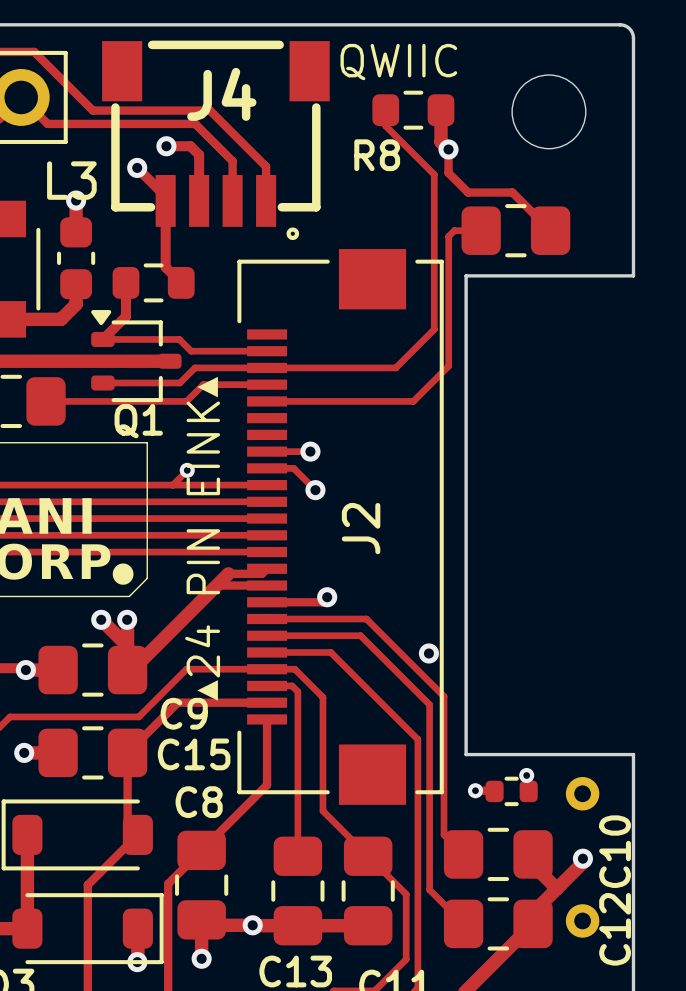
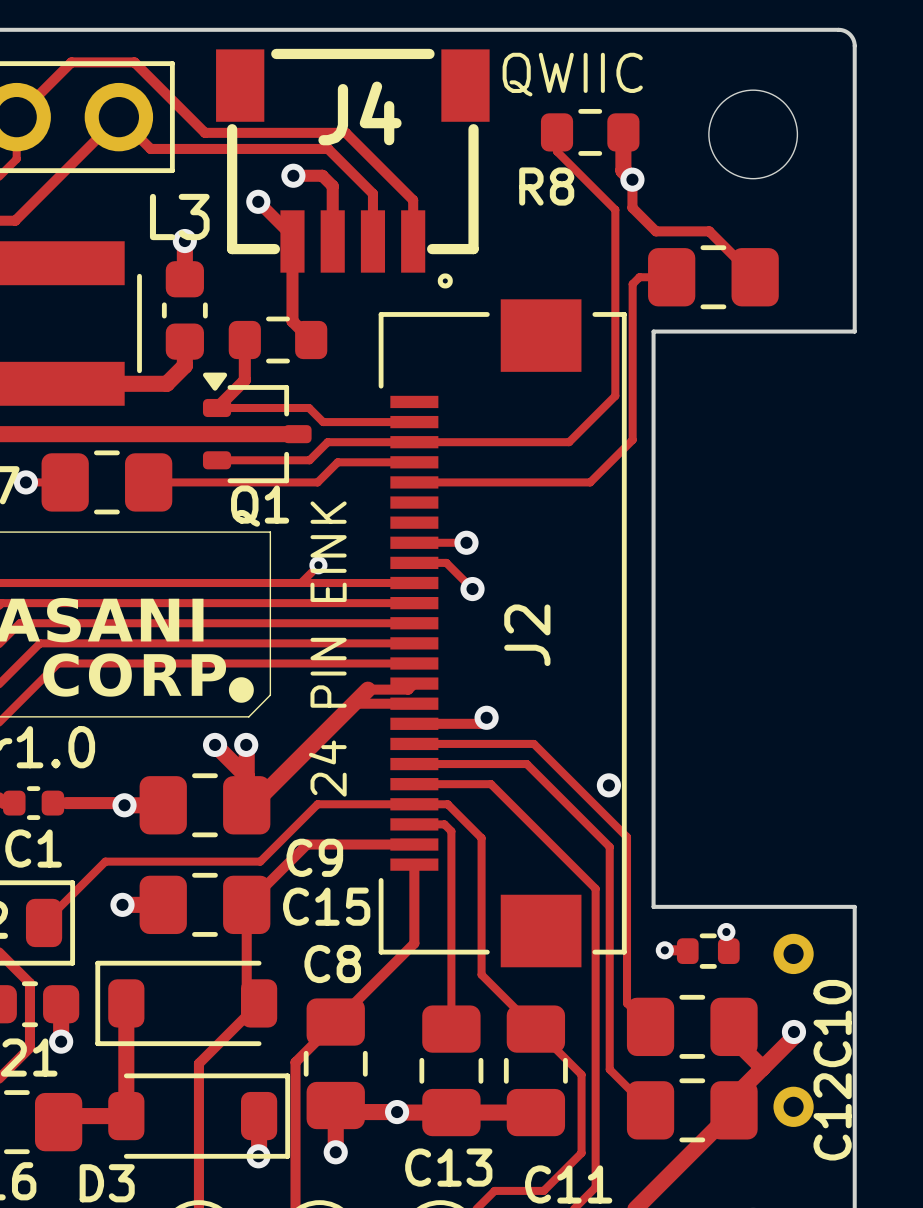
text: ▴24 PIN EINK▴ (202, 538) -> 24 PIN EINK (327, 649)

